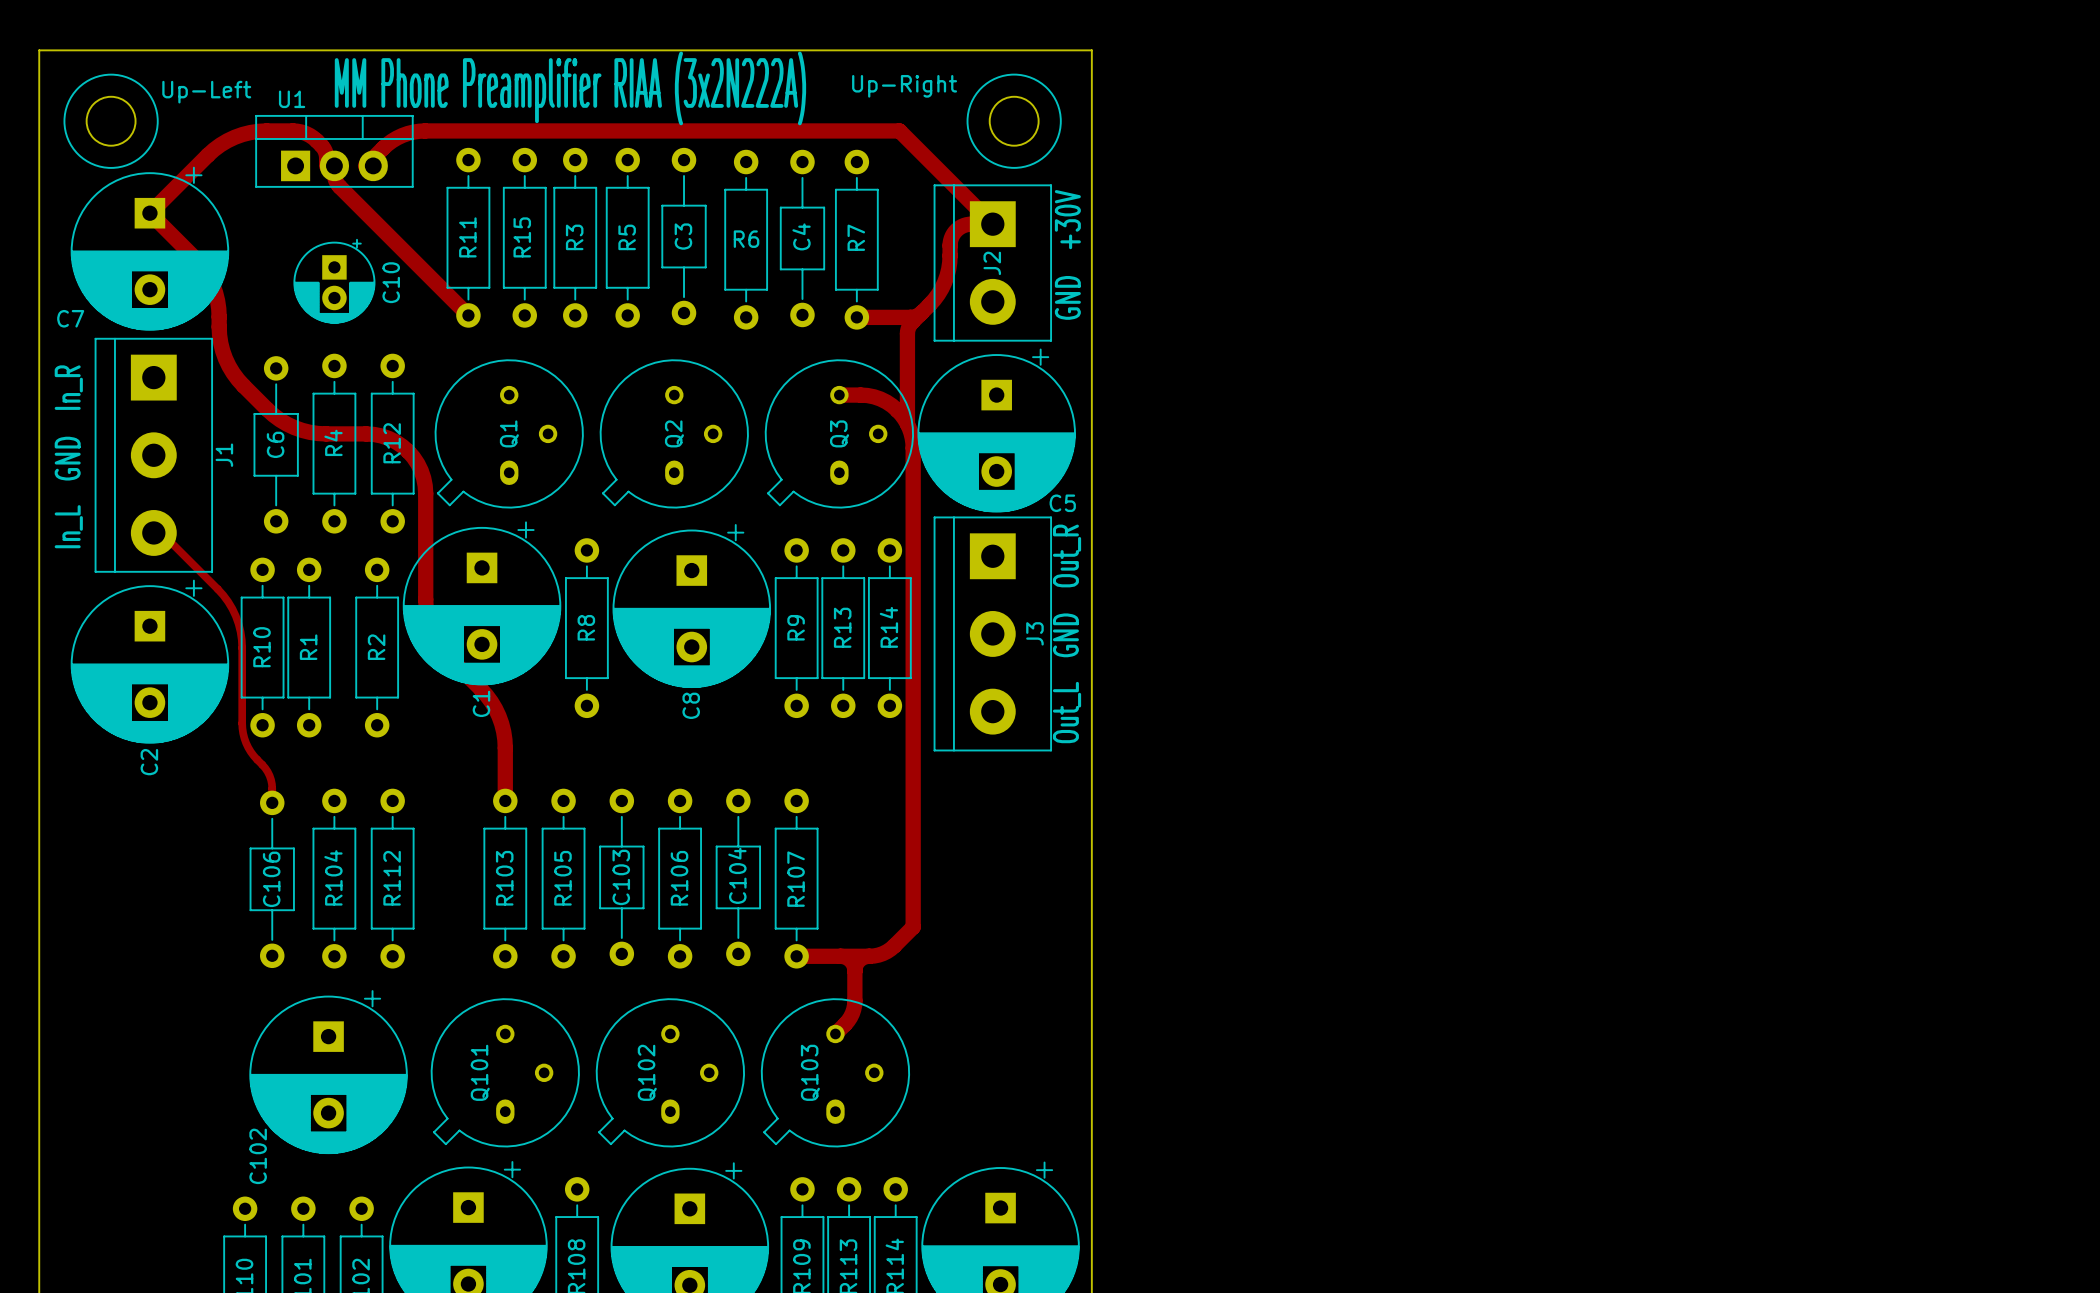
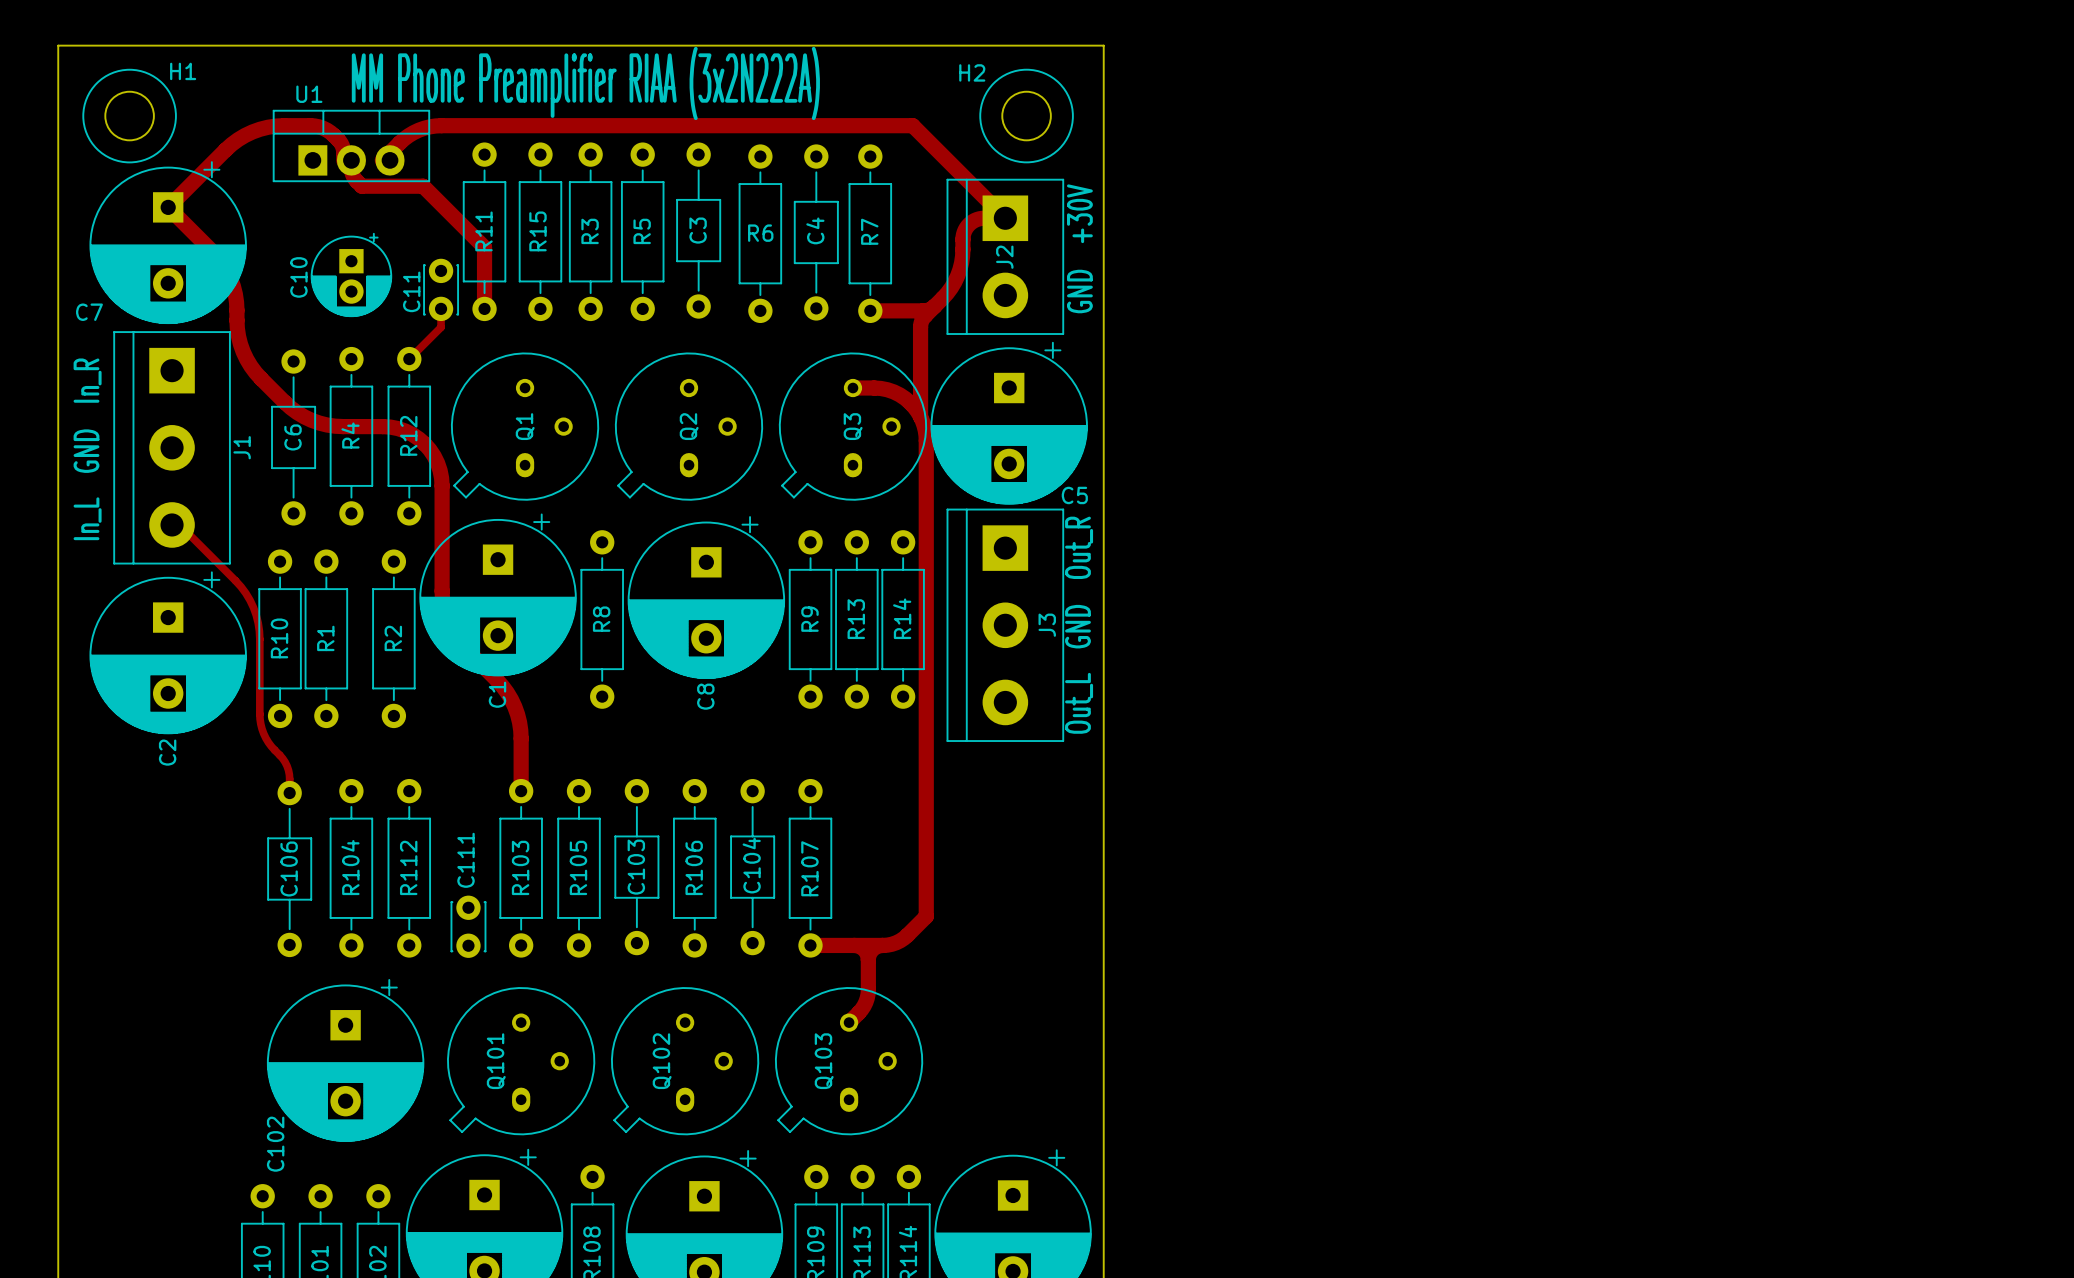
Up-Right name: Up-Right (904, 86) -> H2 (972, 72)
Up-Left name: Up-Left (206, 92) -> H1 (183, 71)
track: (344, 191) (468, 315) -> (361, 186) (423, 186) (484, 247) (484, 308)
C10 name position: C10 (391, 282) -> C10 (298, 277)
C11: none -> (441, 289)
track: none -> (441, 308) (441, 327) (409, 359)
C111: none -> (468, 926)

